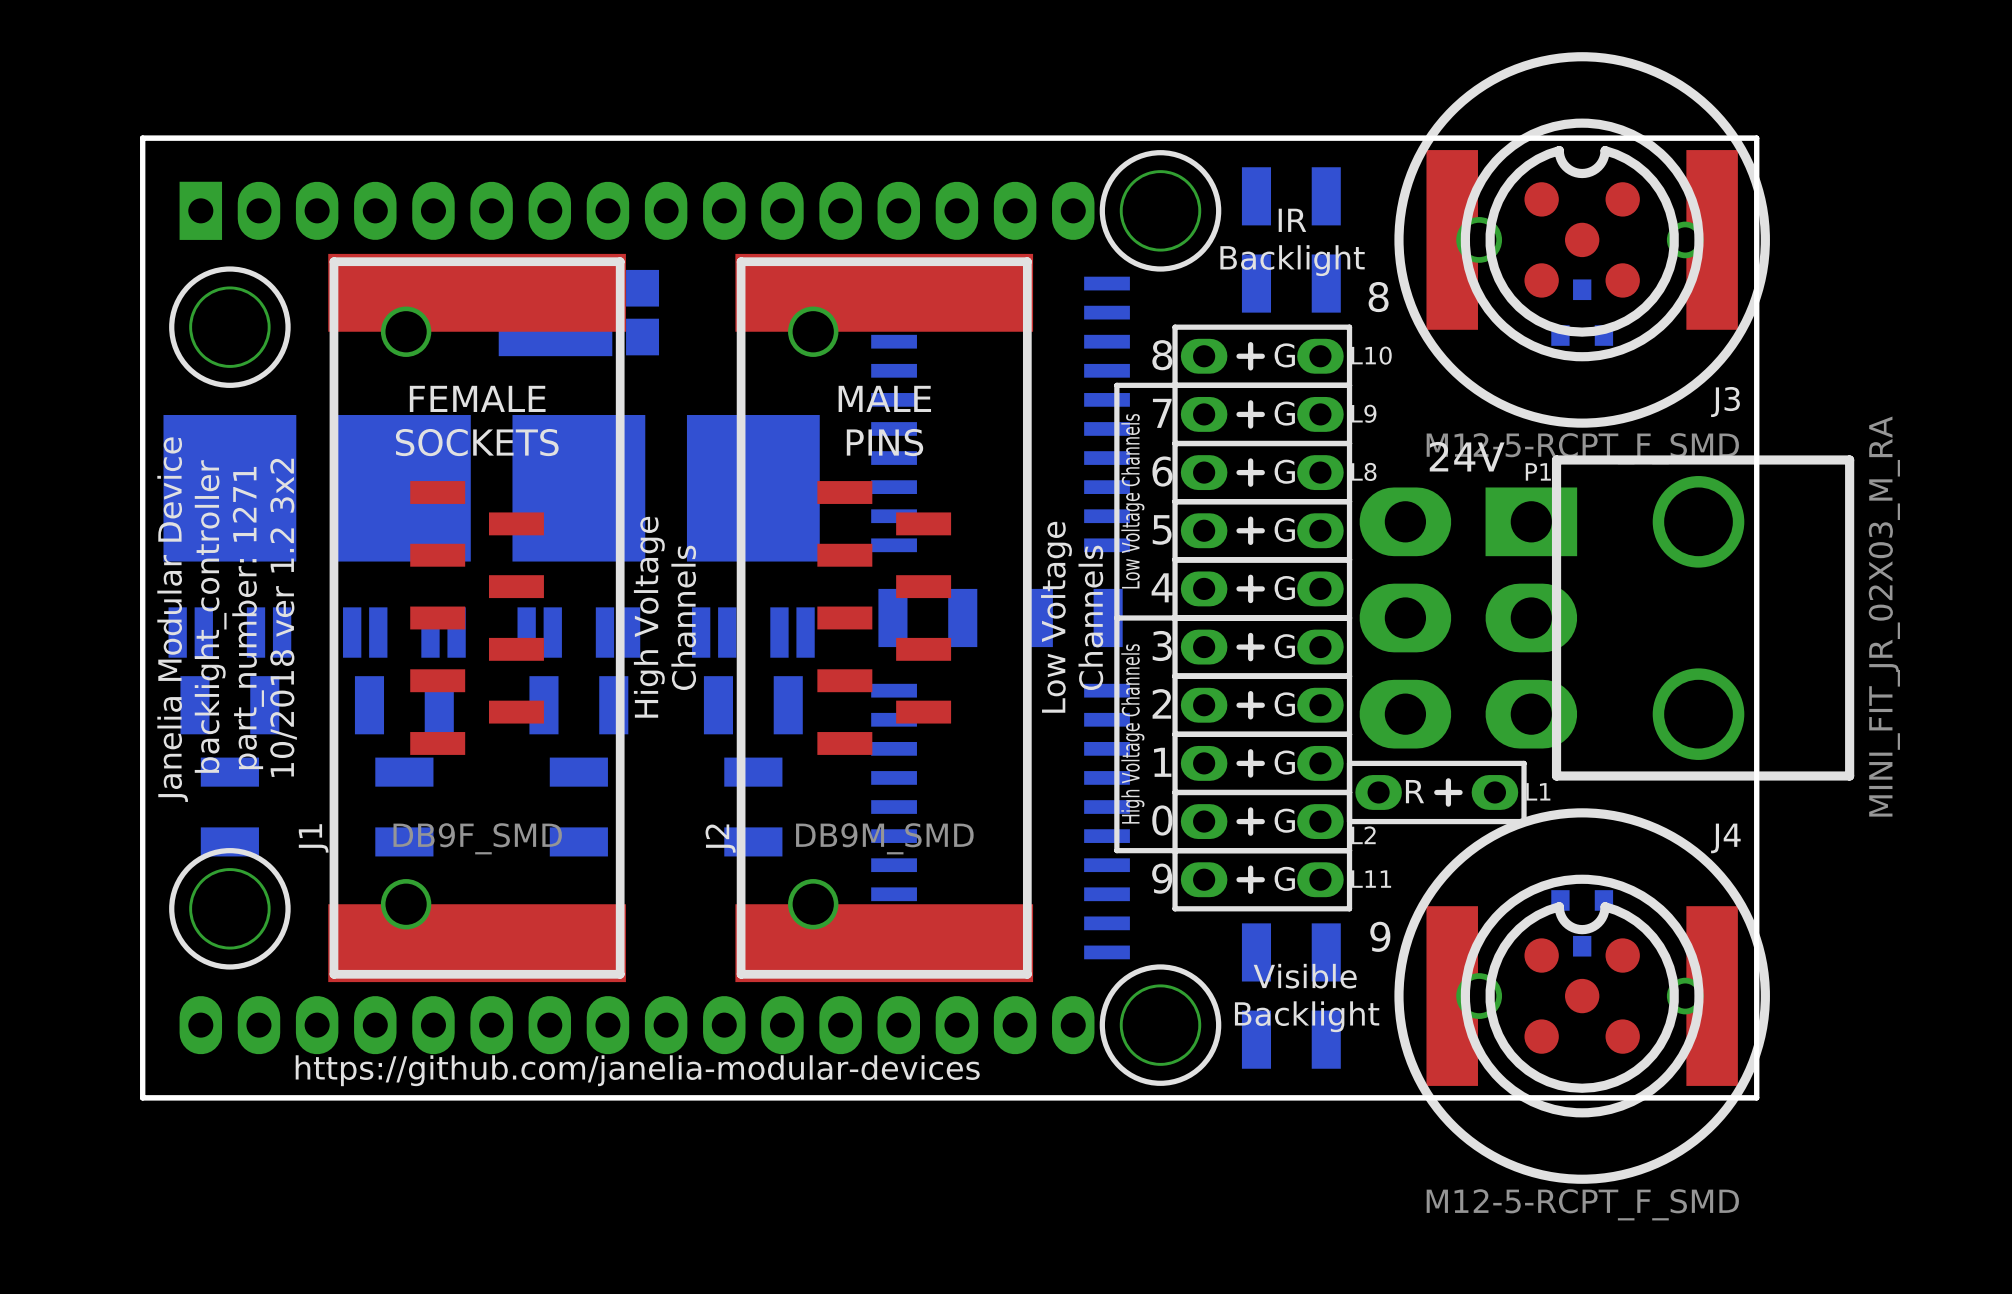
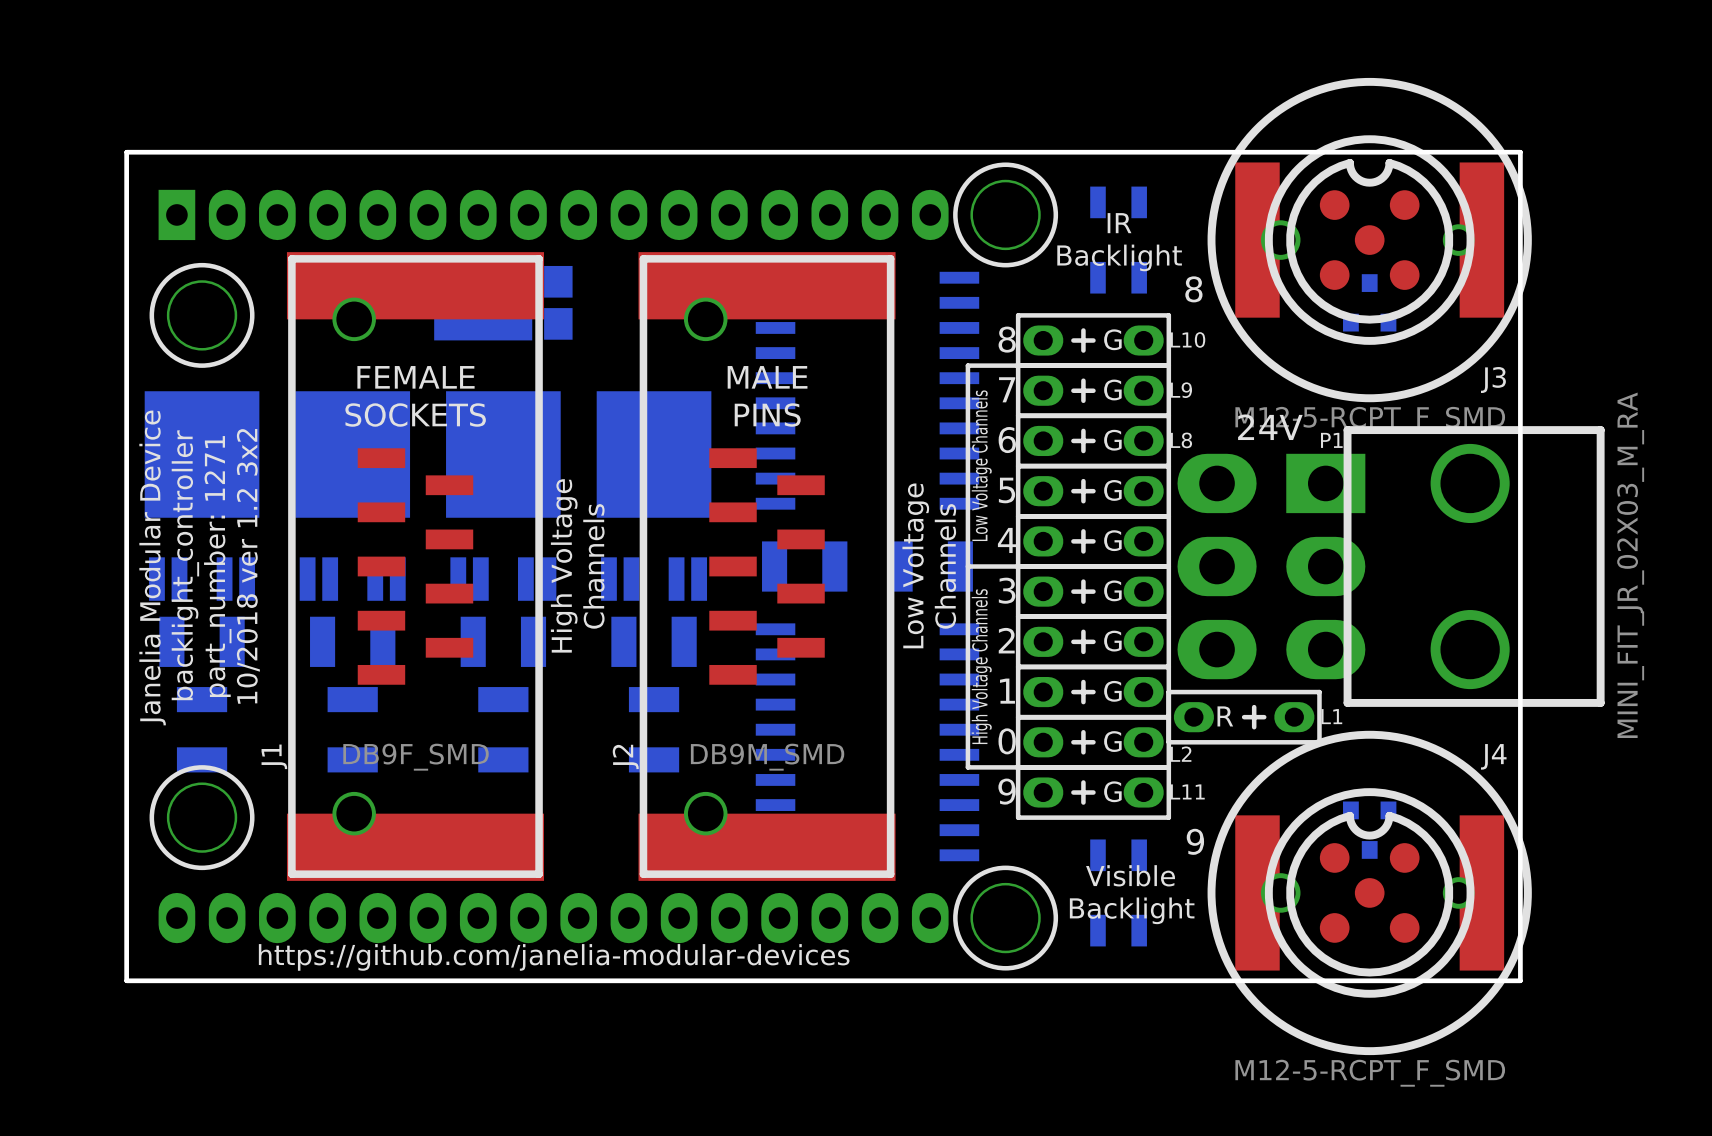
part footprint: [1241, 167, 1341, 226] -> [1090, 186, 1147, 219]
part footprint: [1241, 254, 1341, 313] -> [1090, 261, 1147, 294]
part footprint: [1241, 923, 1341, 982] -> [1090, 839, 1147, 872]
part footprint: [1241, 1010, 1341, 1069] -> [1090, 914, 1147, 947]

